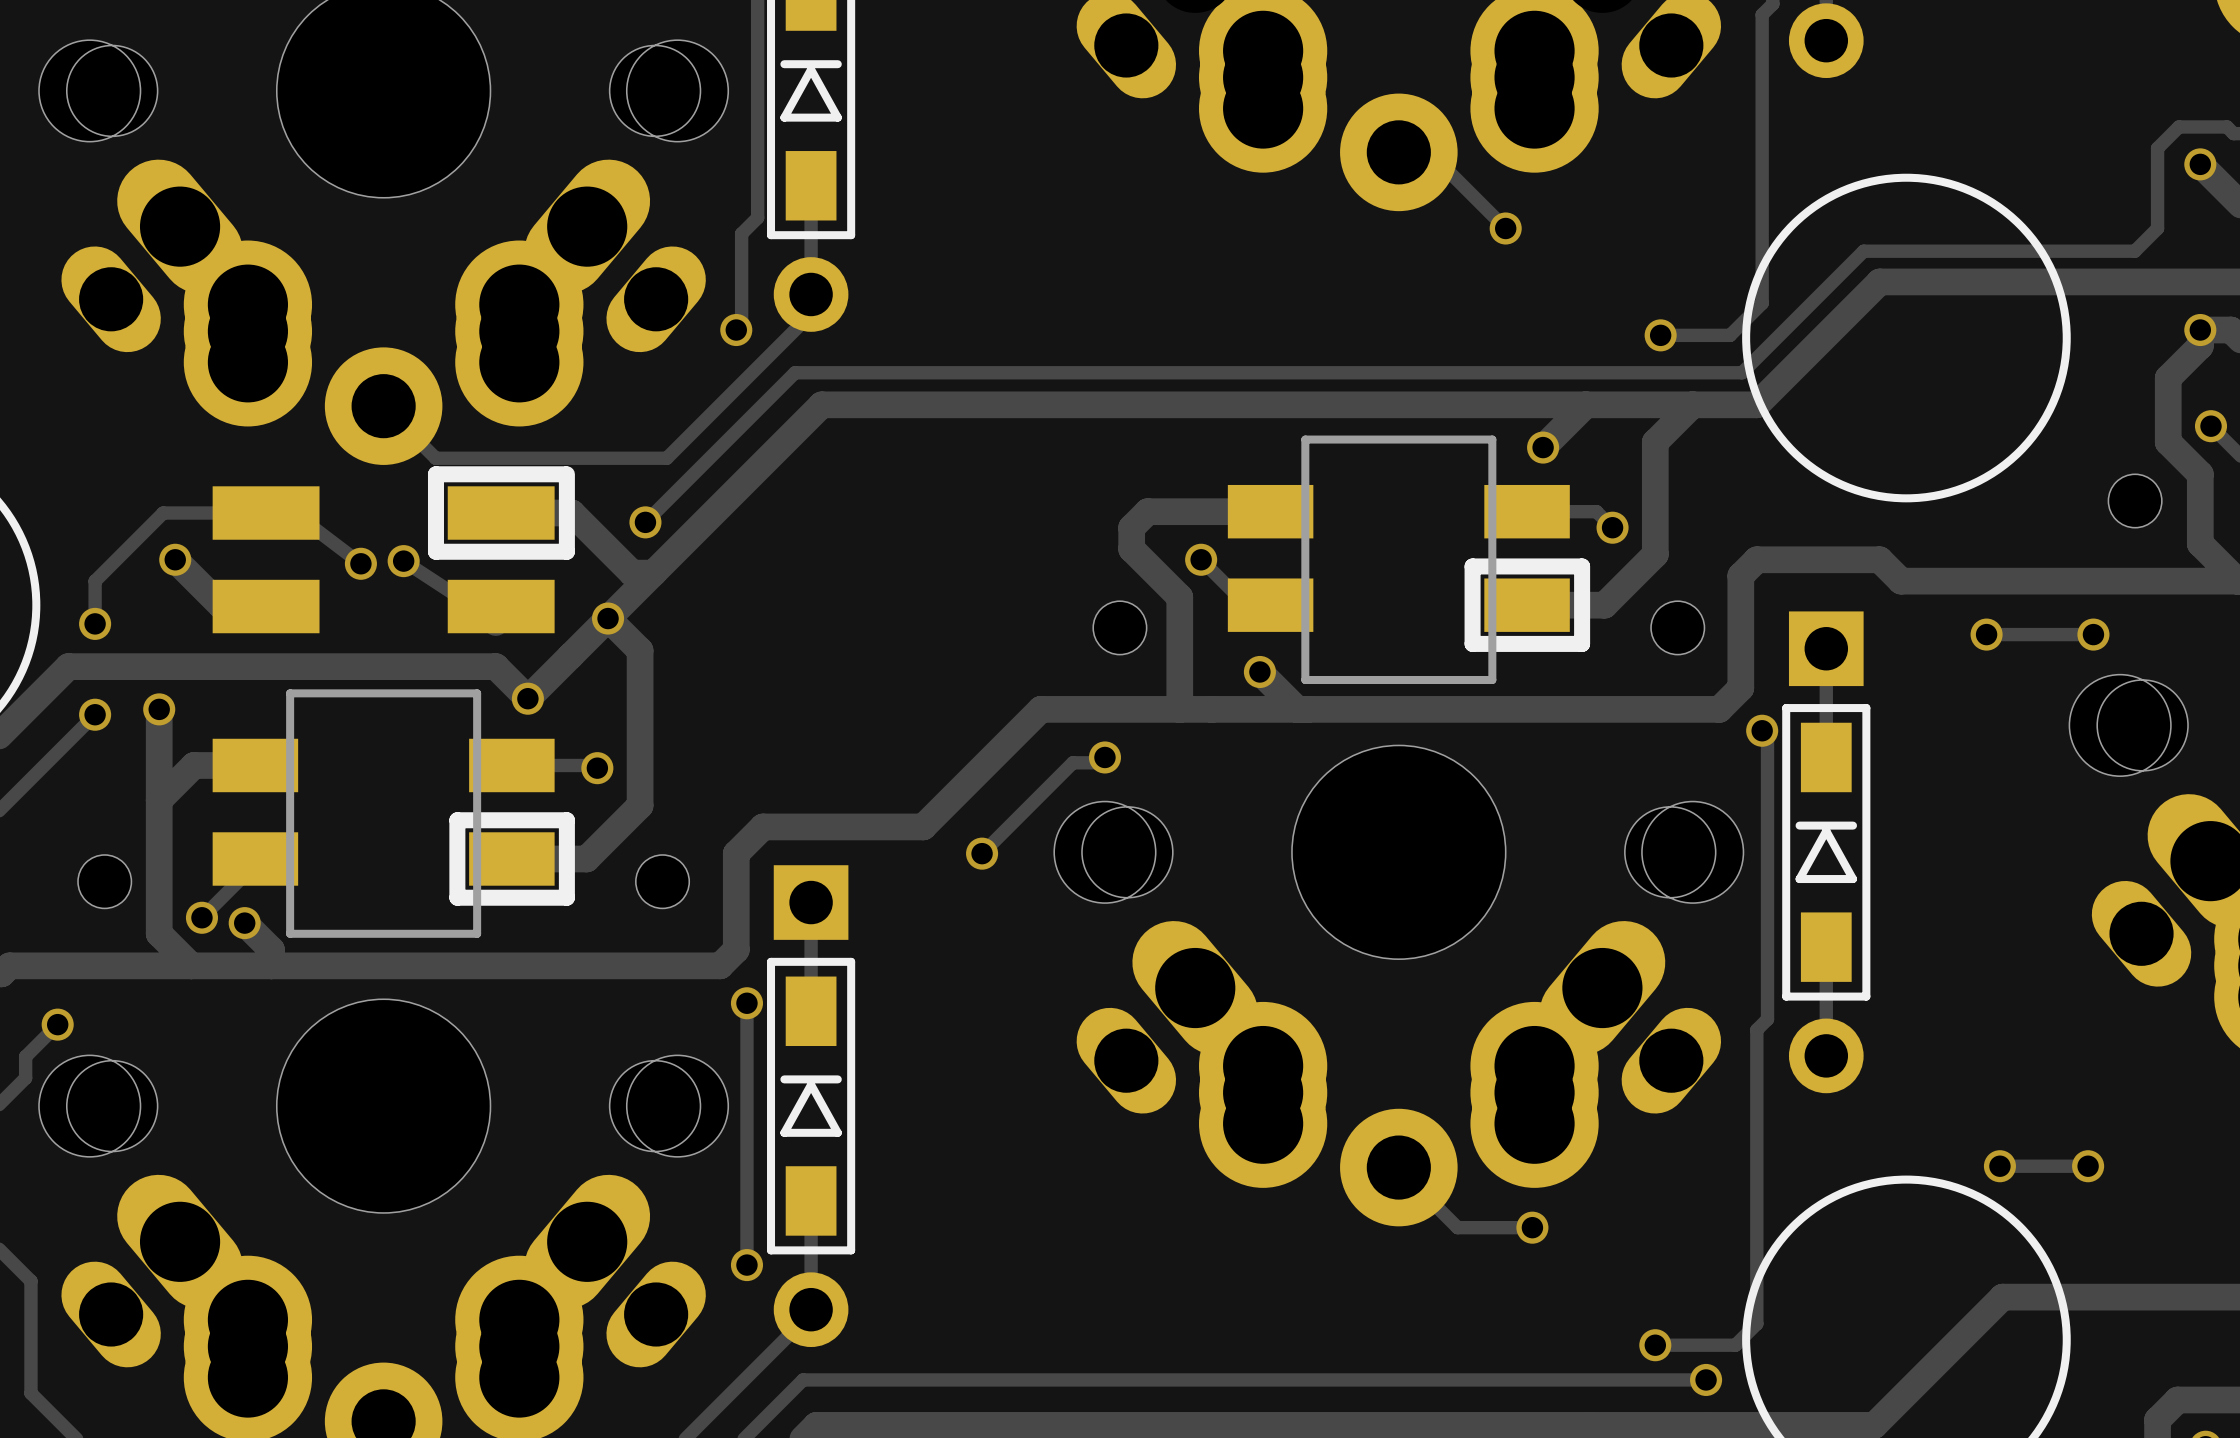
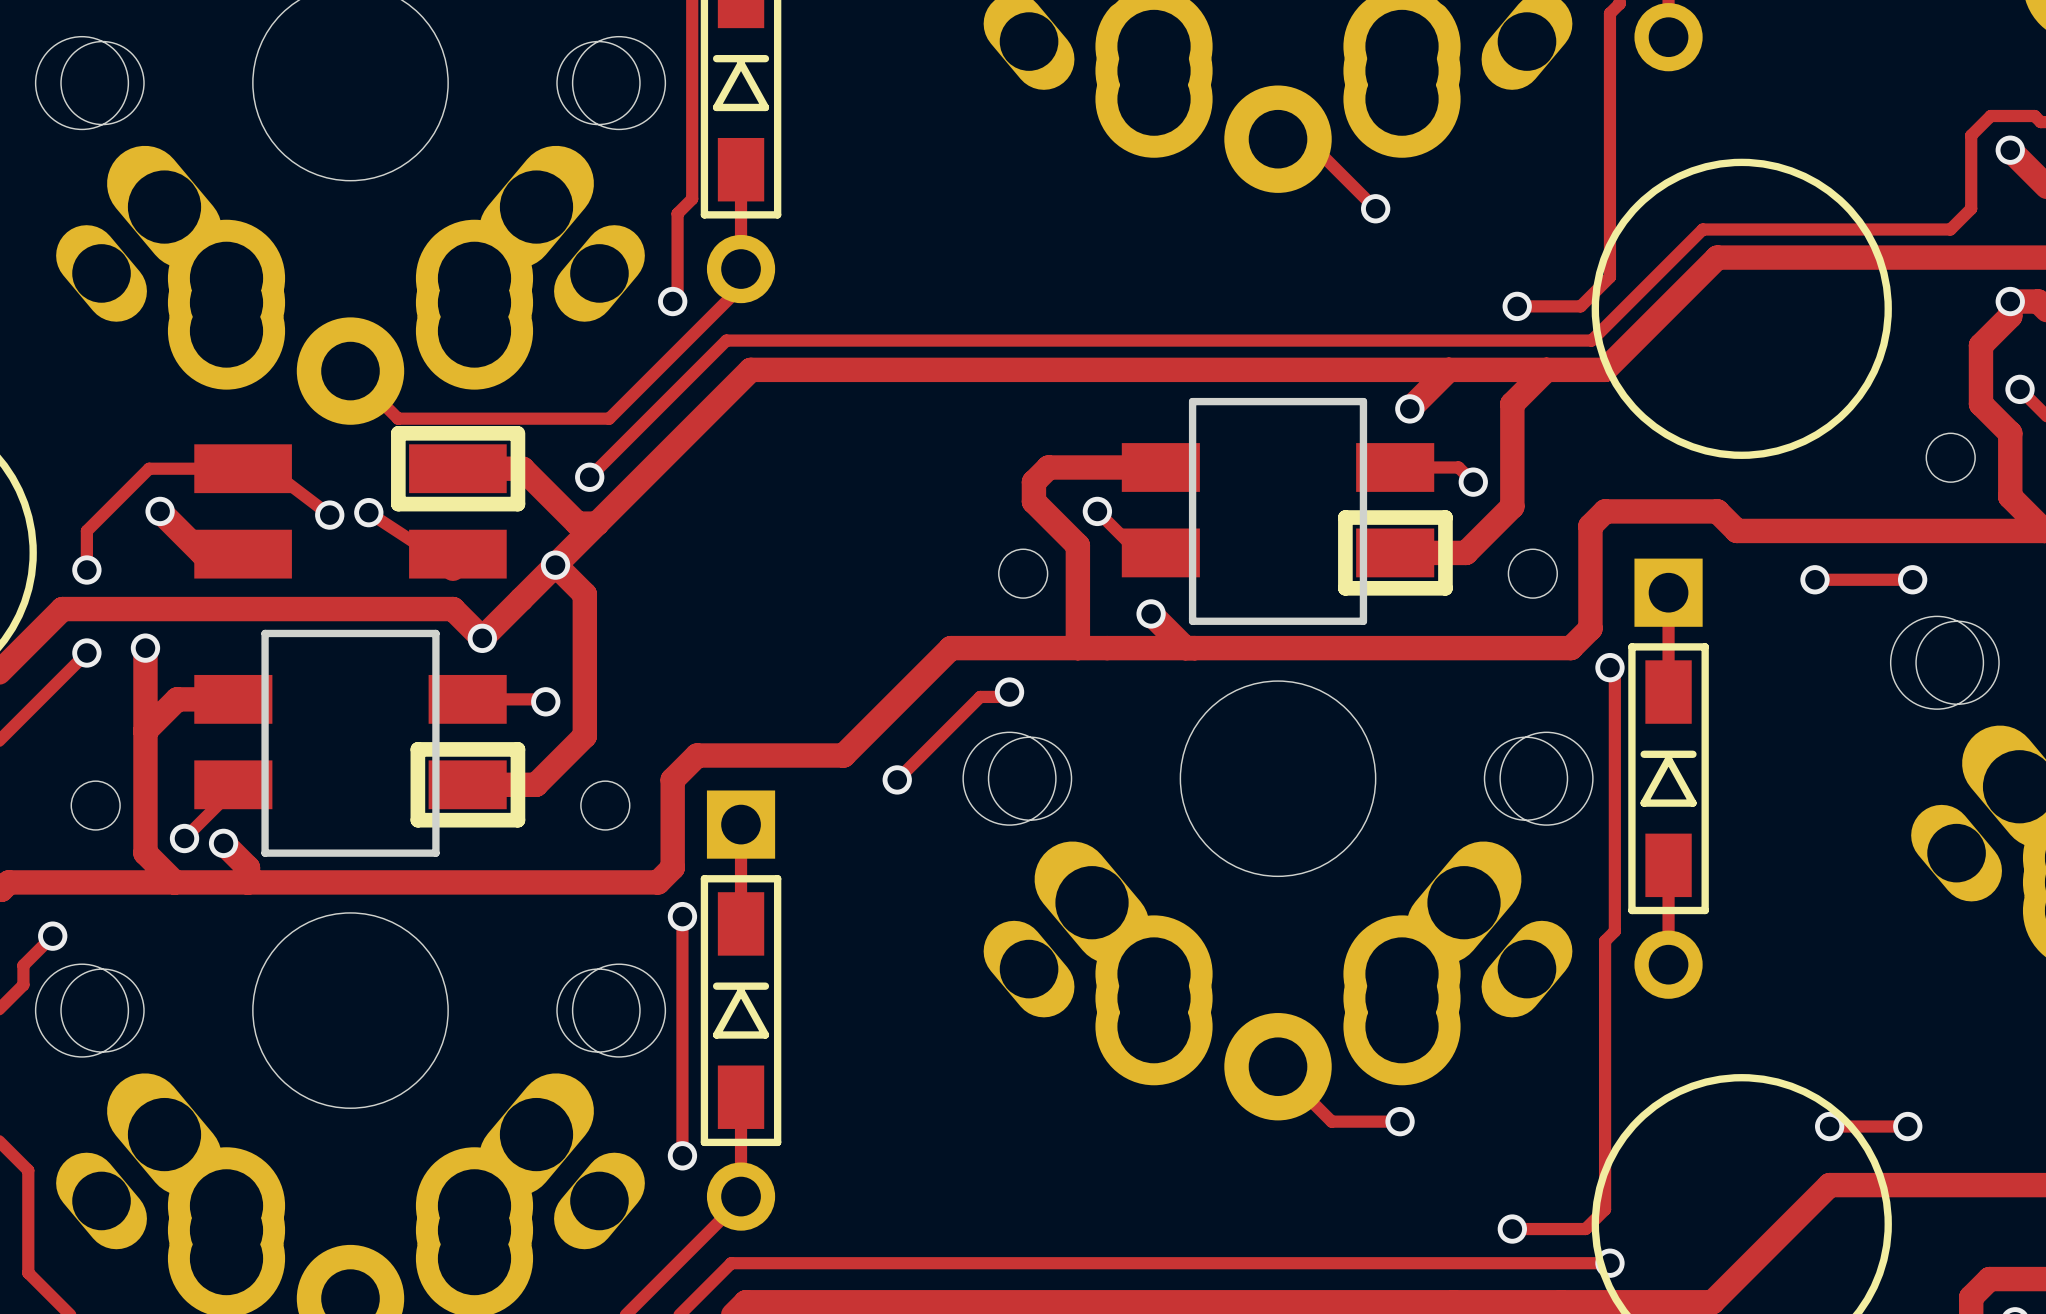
track: (1999, 1166) (2088, 1166) -> none
via: (1999, 1166) -> none
via: (2088, 1166) -> none
track: none -> (1829, 1126) (1907, 1126)
via: none -> (1829, 1126)
via: none -> (1907, 1126)
track: (1706, 1379) (803, 1379) (800, 1382) -> (1609, 1263) (731, 1263)
via position: (1706, 1379) -> (1609, 1263)

